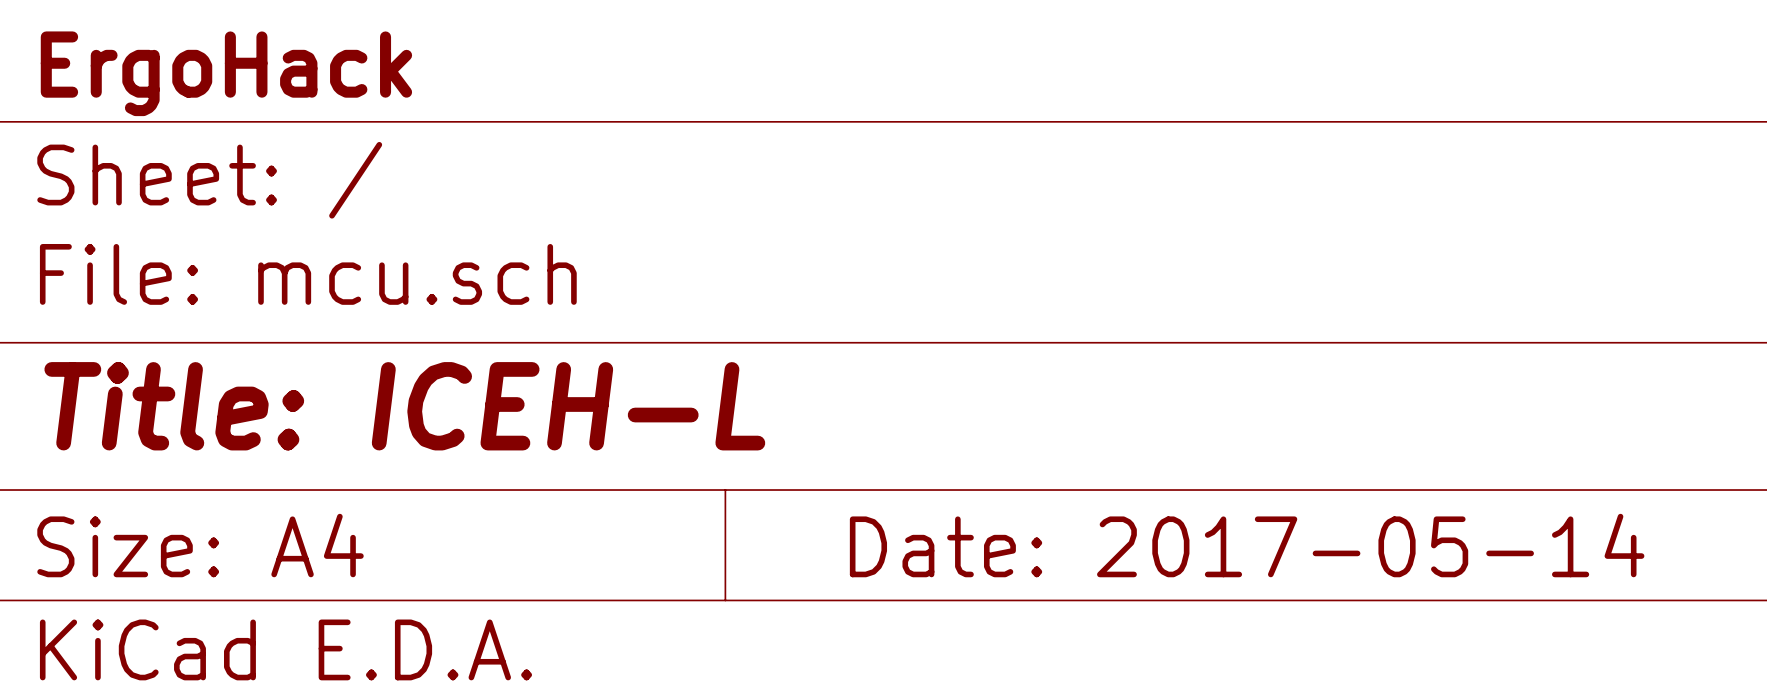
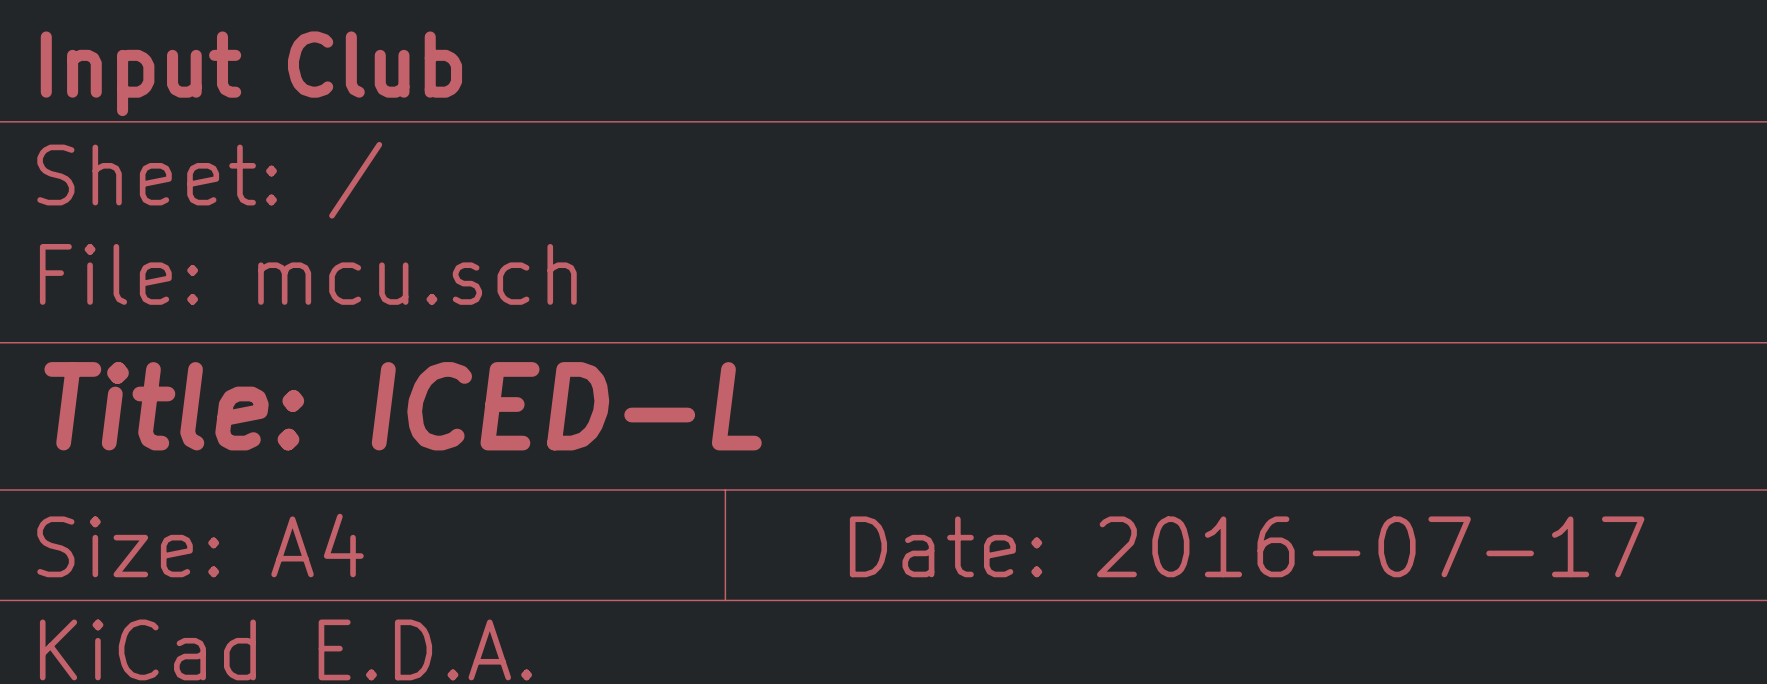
title block: ErgoHack (226, 73) -> Input Club (251, 73)
title block: Title: ICEH-L (404, 406) -> Title: ICED-L (403, 406)
title block: Date: 2017-05-14 (1247, 545) -> Date: 2016-07-17 (1247, 546)

